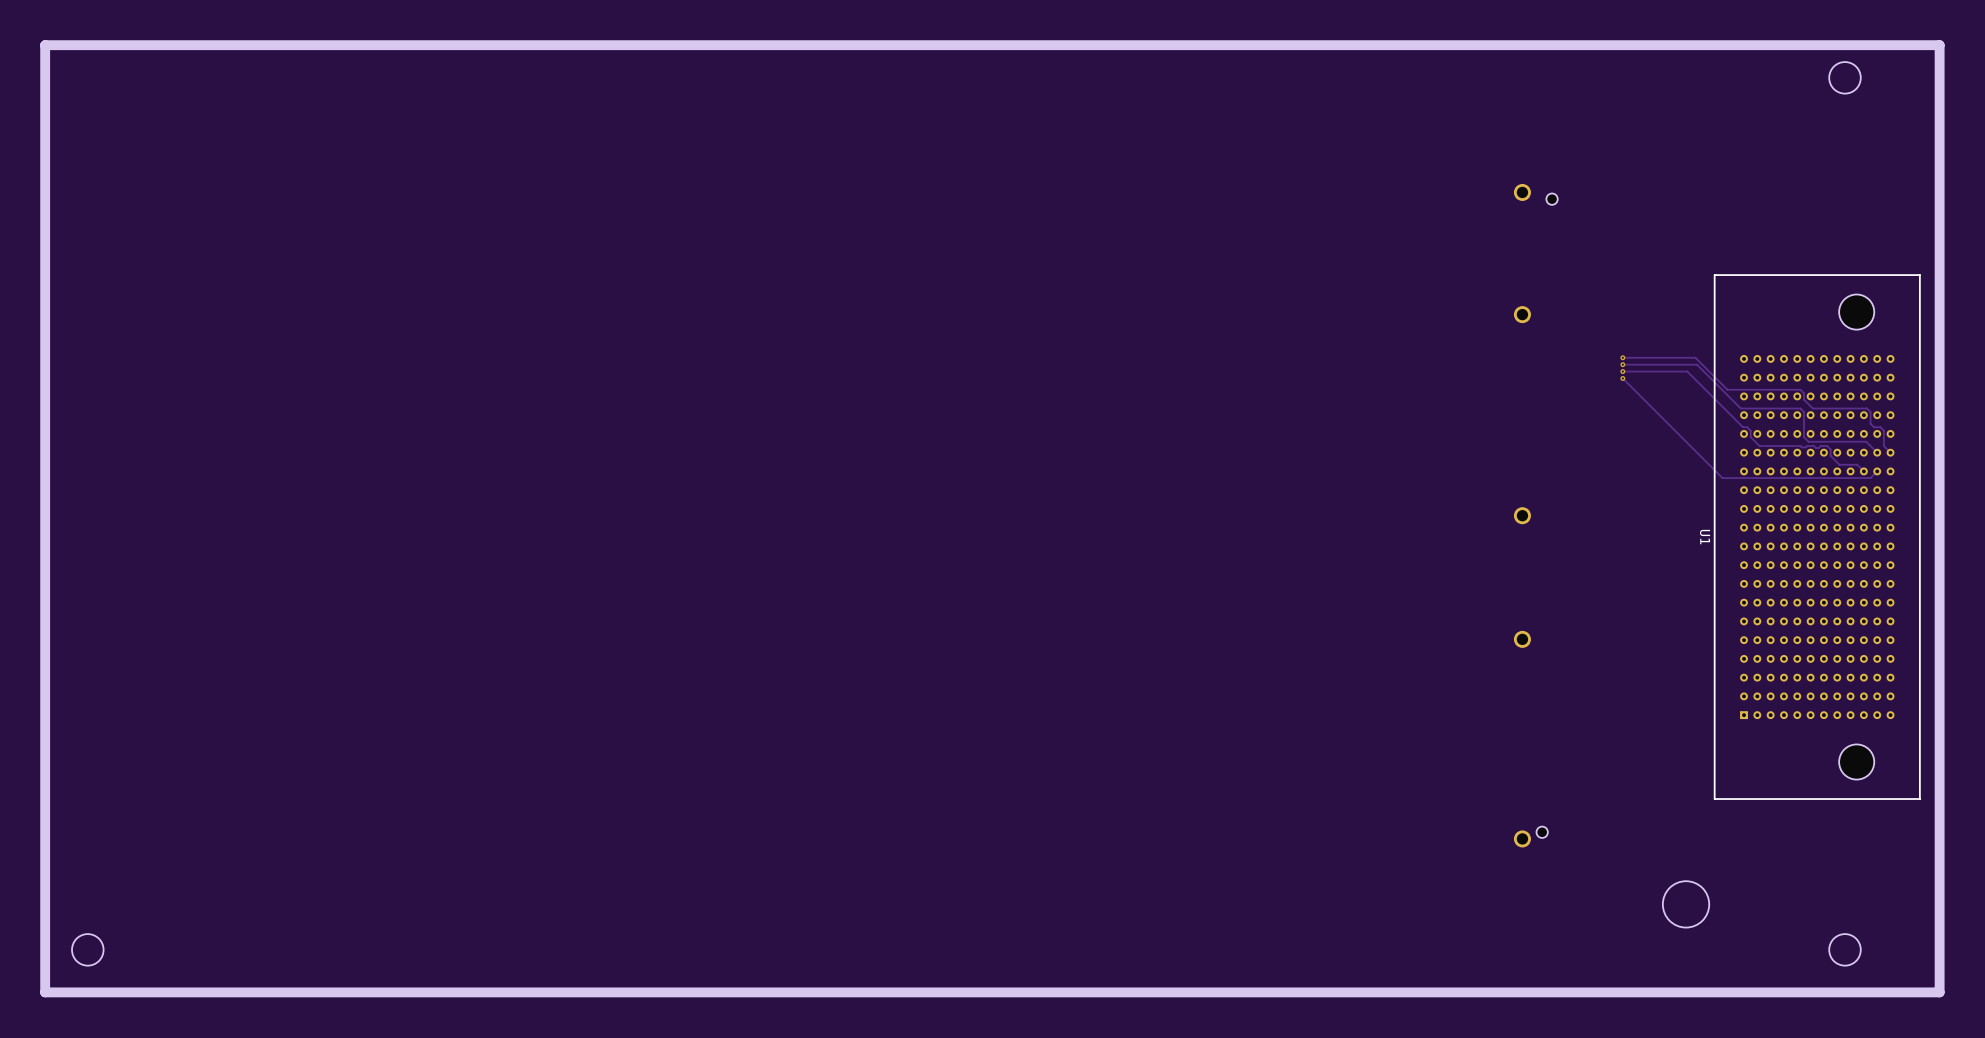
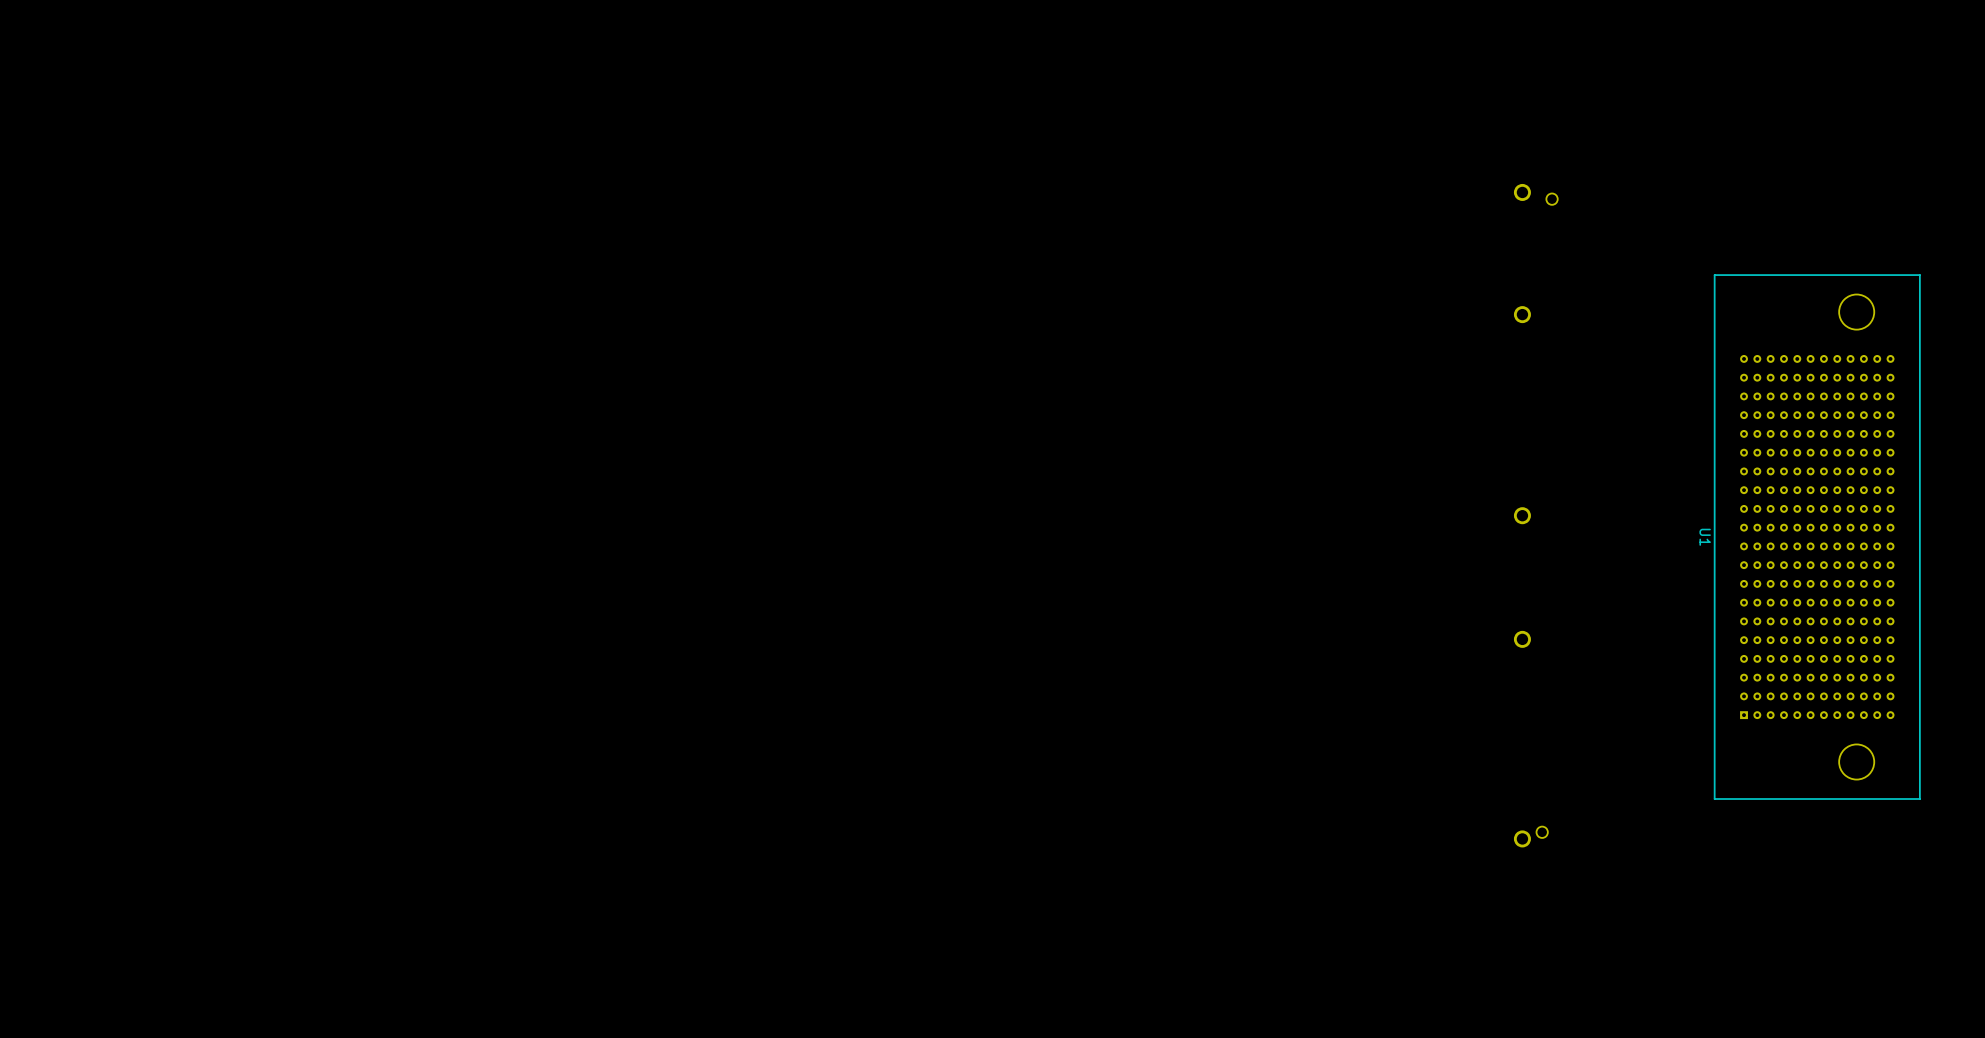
board edge: (1939, 45) (45, 45) (45, 992) (1939, 992) (1939, 45) -> none
round board edge: [1828, 61, 1862, 94] -> none
track: (1622, 357) (1695, 357) (1727, 389) (1800, 389) (1803, 393) (1803, 399) (1812, 408) (1867, 408) (1870, 411) (1870, 423) (1883, 430) (1883, 446) (1890, 452) -> none
via: (1622, 357) -> none
track: (1622, 364) (1696, 364) (1740, 408) (1800, 408) (1803, 411) (1803, 437) (1808, 441) (1866, 441) (1877, 452) -> none
via: (1622, 364) -> none
track: (1622, 371) (1687, 371) (1743, 427) (1747, 427) (1750, 430) (1750, 437) (1759, 446) (1813, 446) (1815, 448) (1827, 446) (1830, 449) (1830, 455) (1839, 464) (1857, 464) (1863, 471) -> none
via: (1622, 371) -> none
track: (1622, 378) (1722, 478) (1870, 478) (1877, 471) -> none
via: (1622, 378) -> none
round board edge: [1662, 880, 1710, 928] -> none
round board edge: [71, 933, 104, 966] -> none
round board edge: [1828, 933, 1862, 967] -> none

